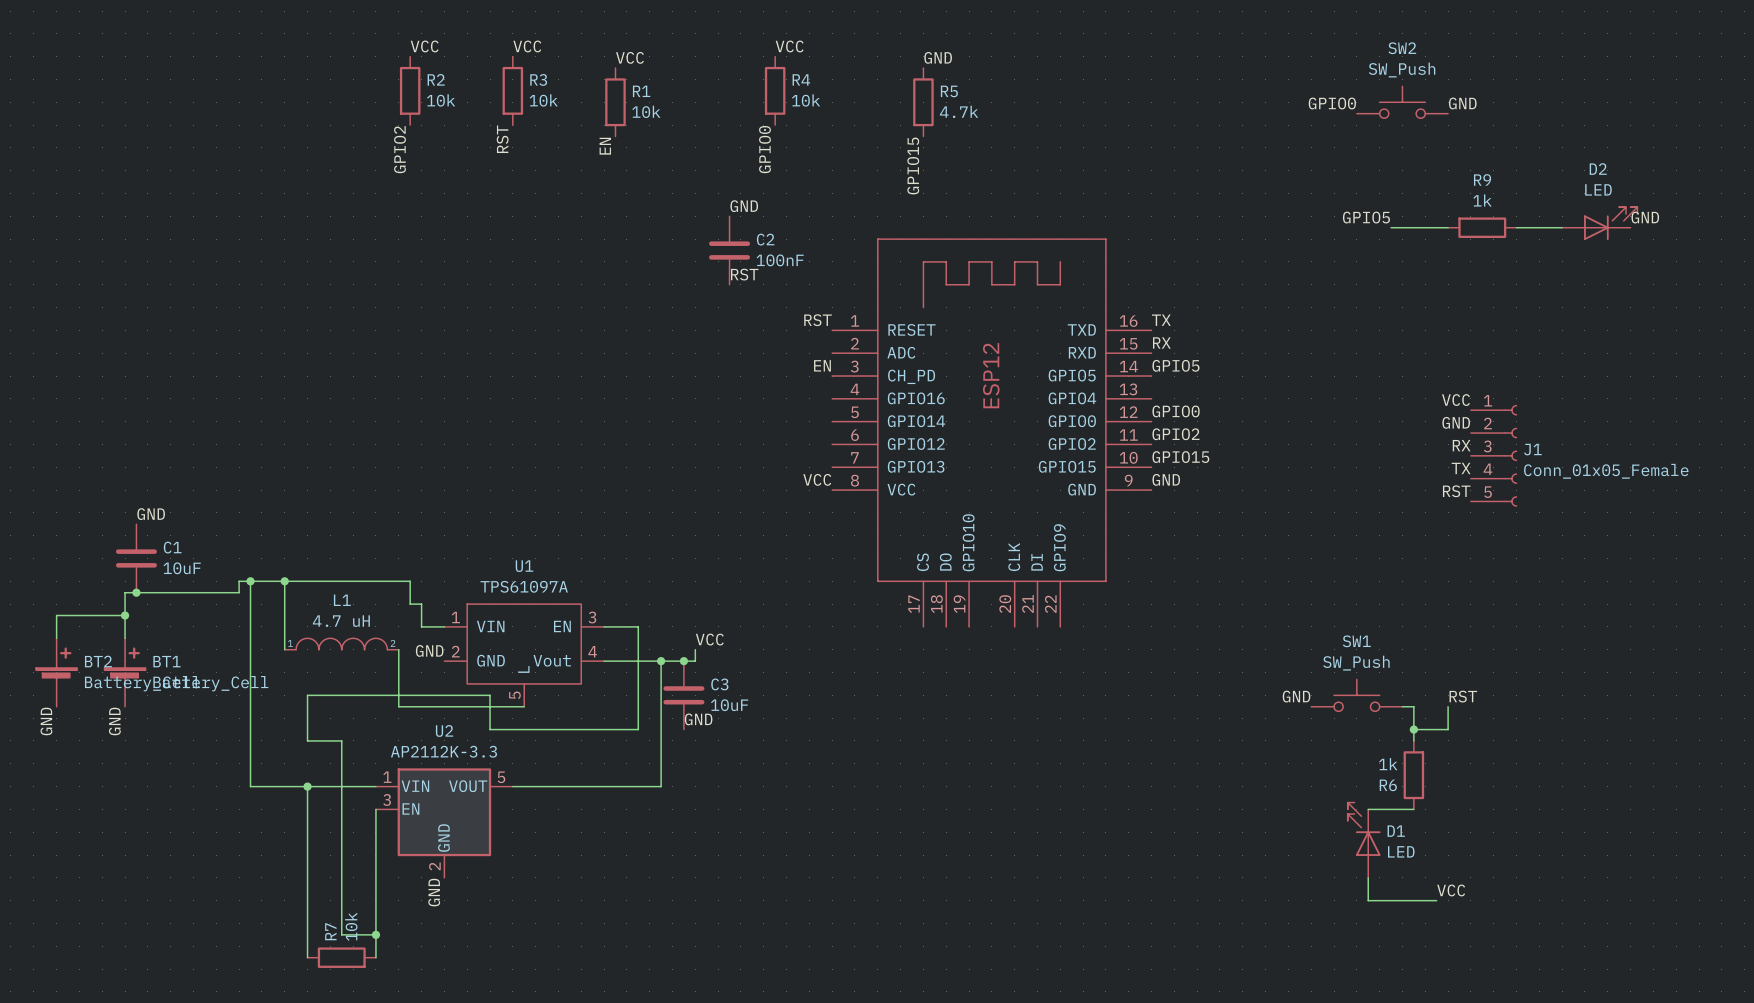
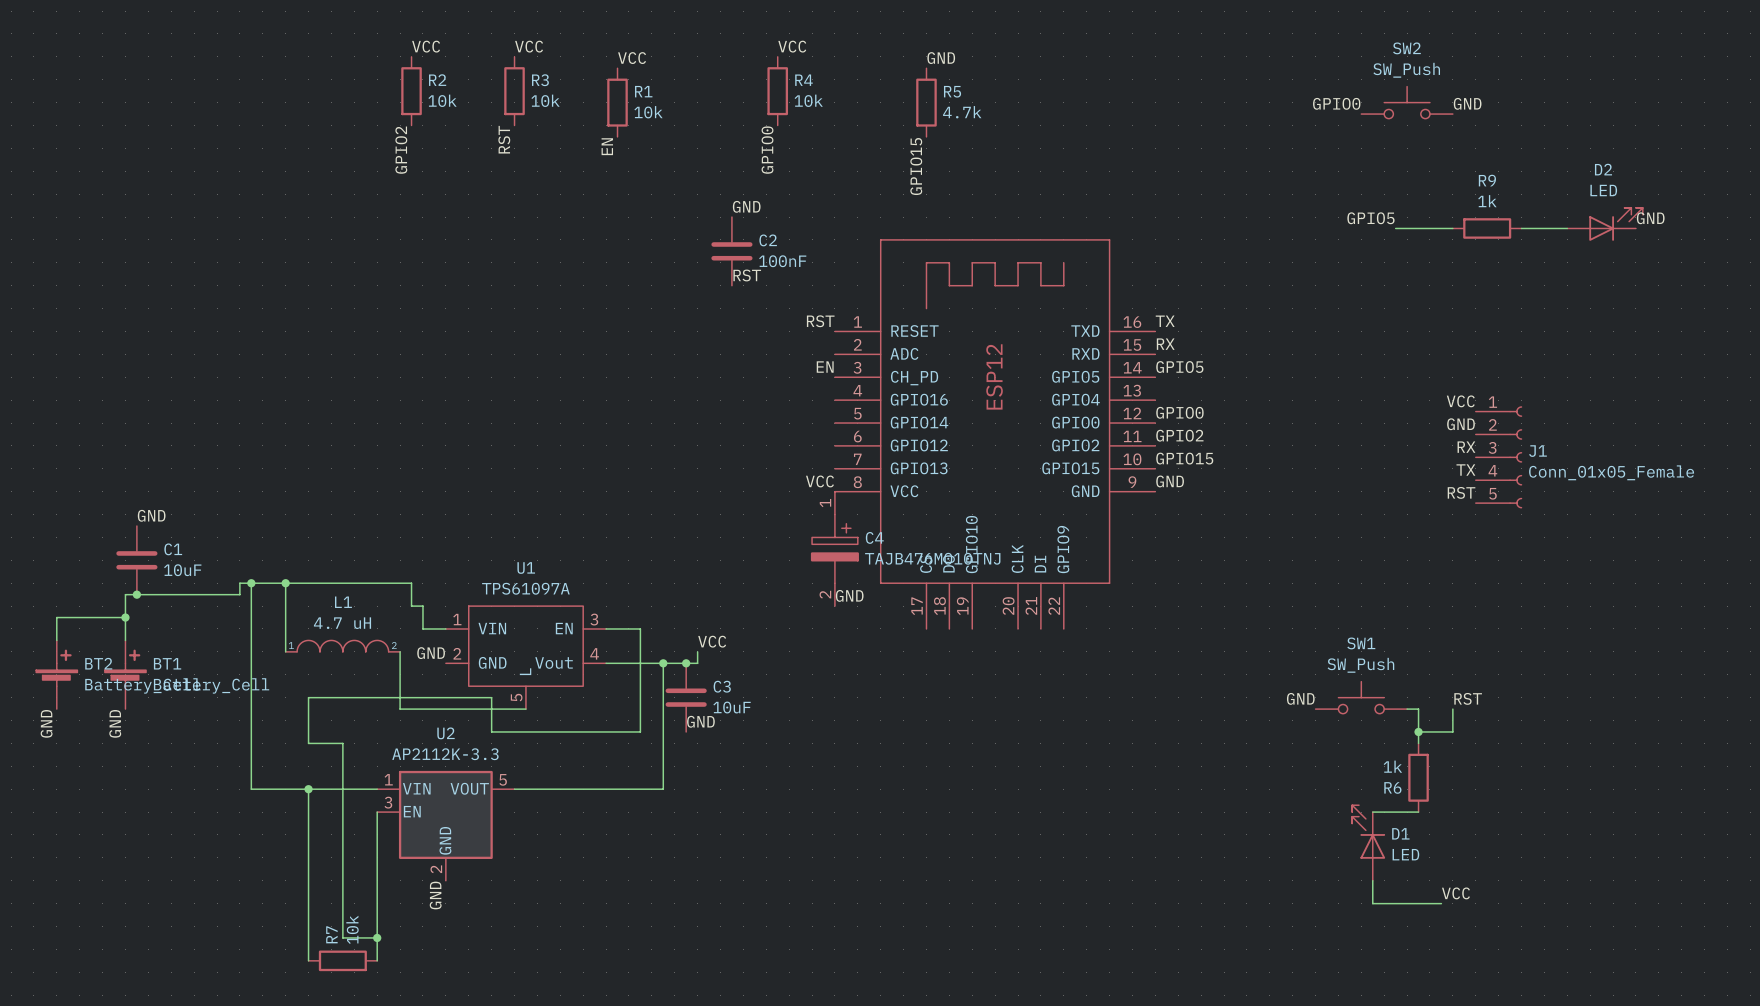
C4: none -> TAJB476M010TNJ (834, 548)
label: none -> GND (849, 595)

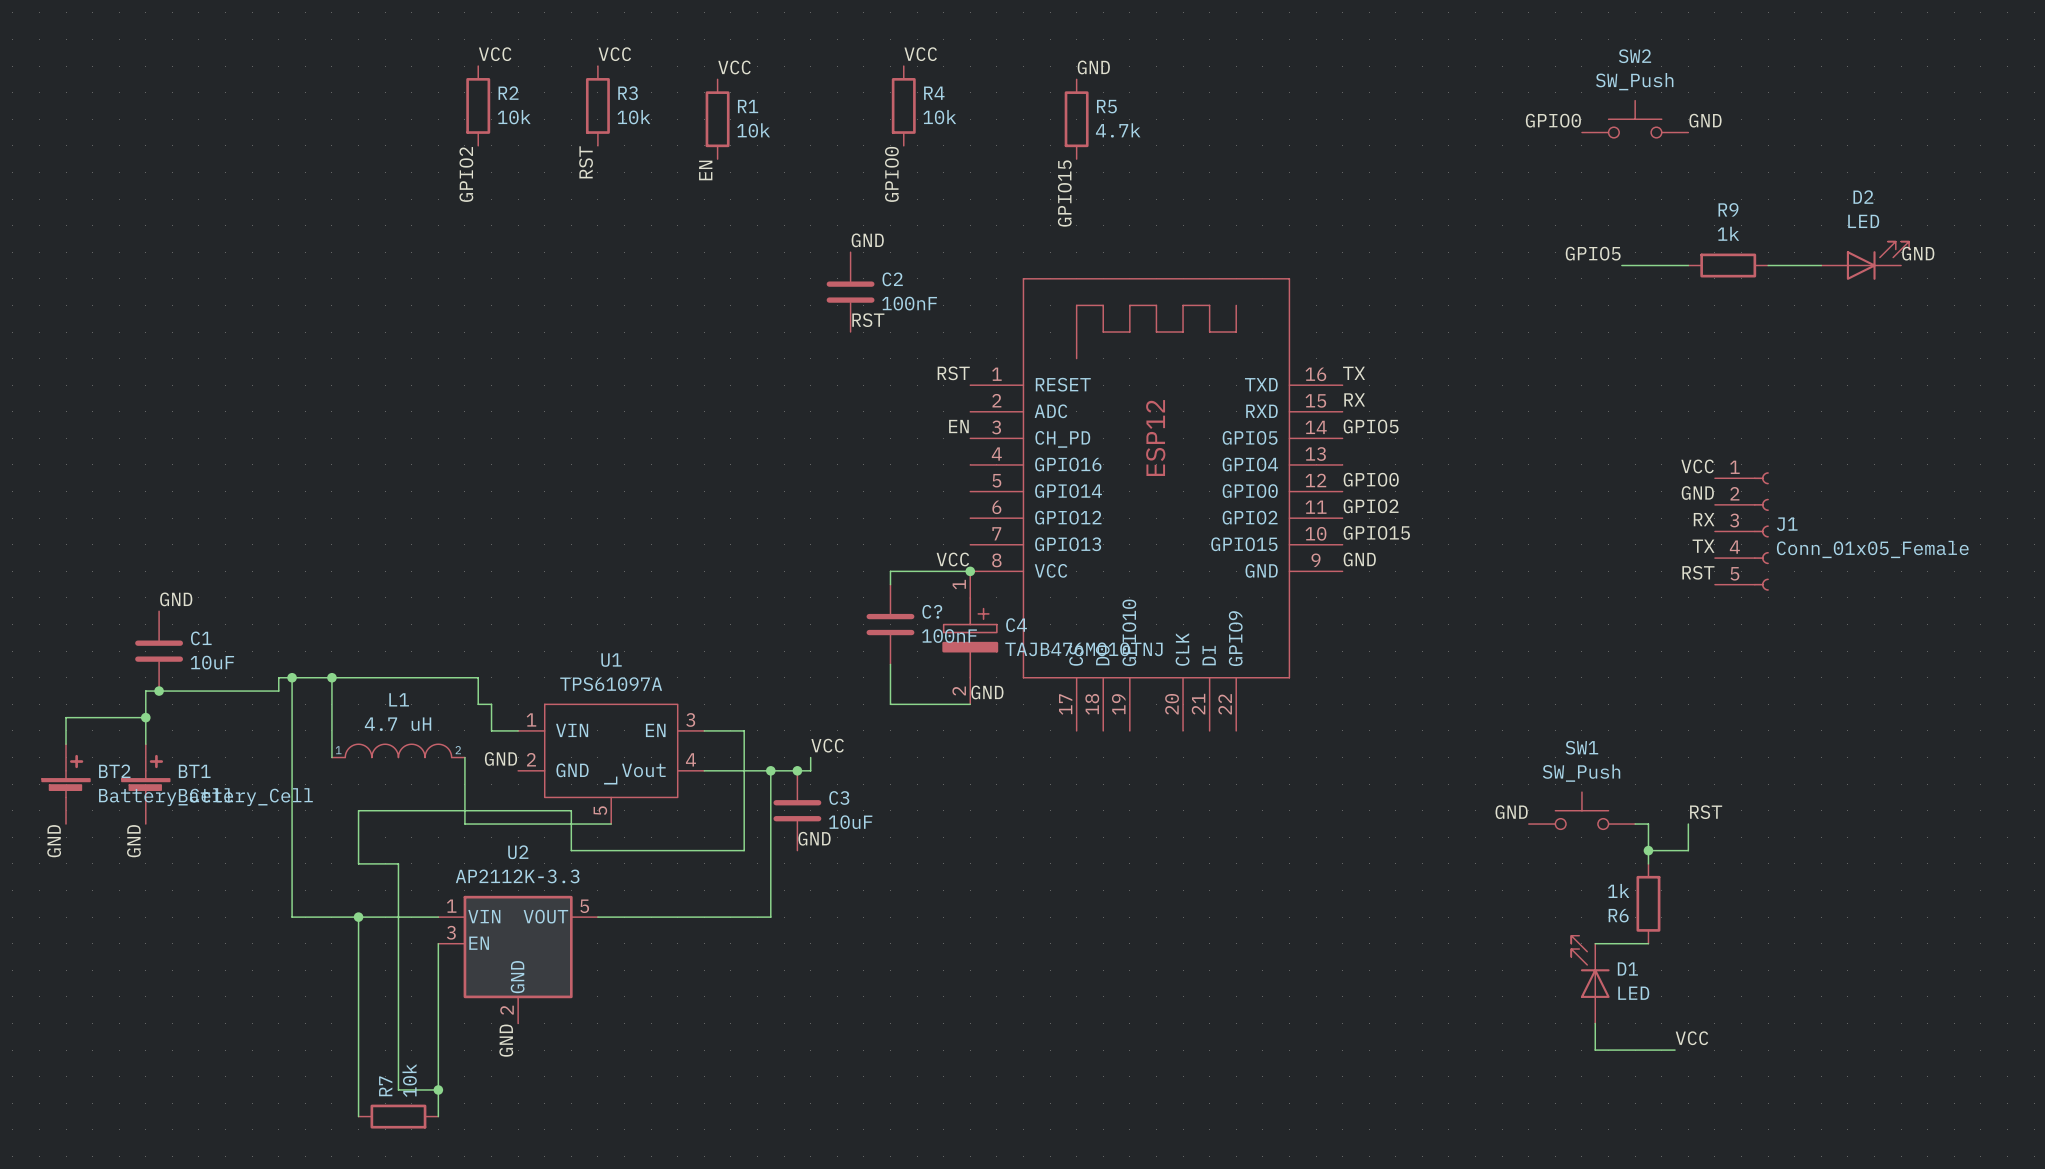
wire: none -> (970, 571) (890, 571) (890, 584)
junction: none -> (970, 571)
C?: none -> 100nF (890, 624)
wire: none -> (890, 664) (890, 704) (970, 704)

